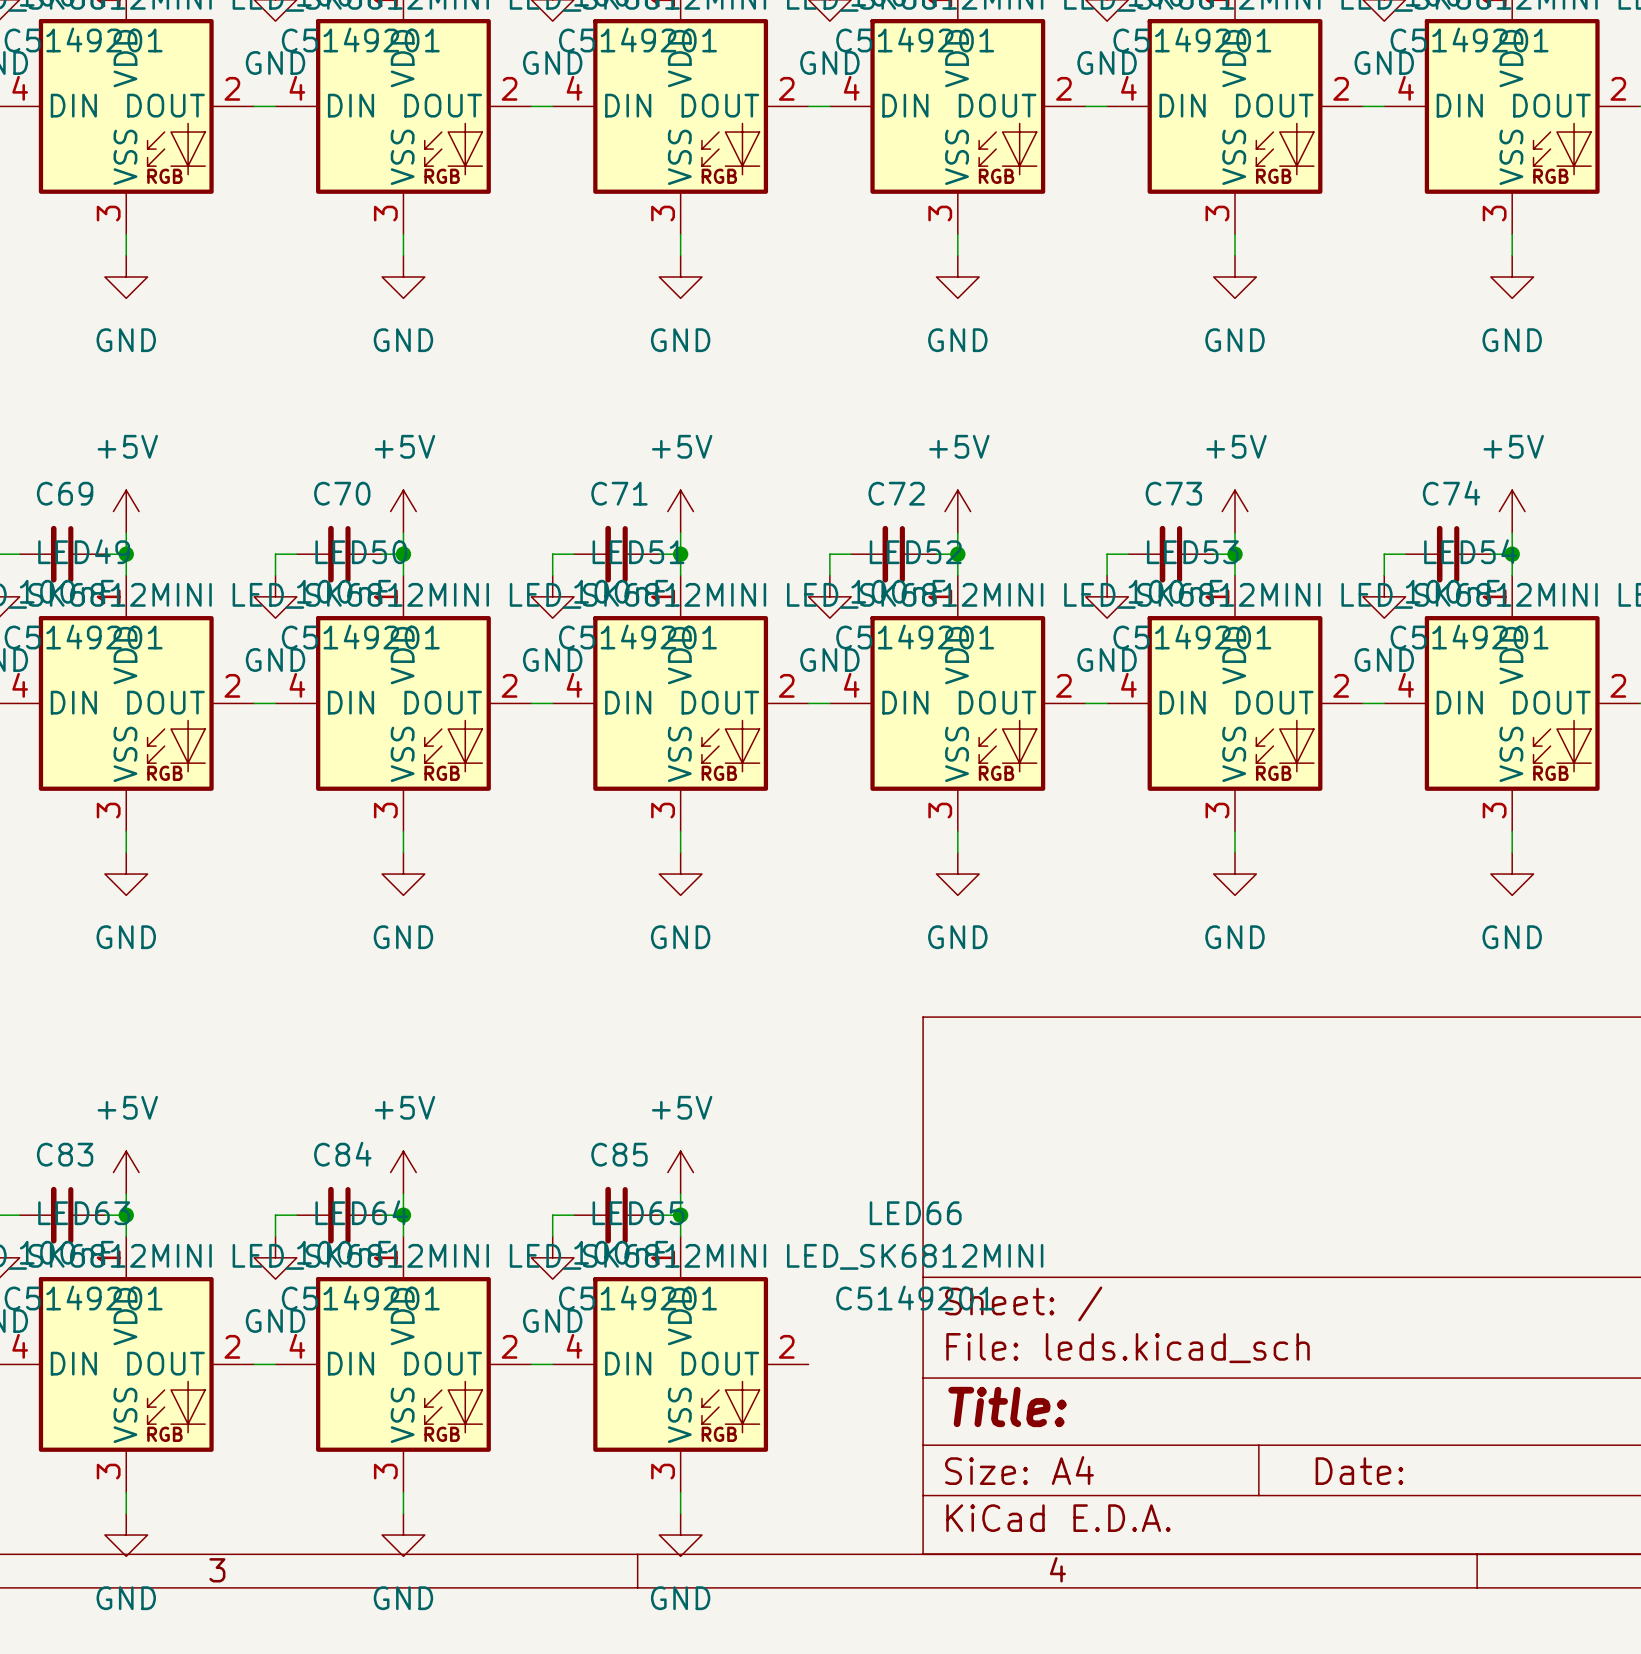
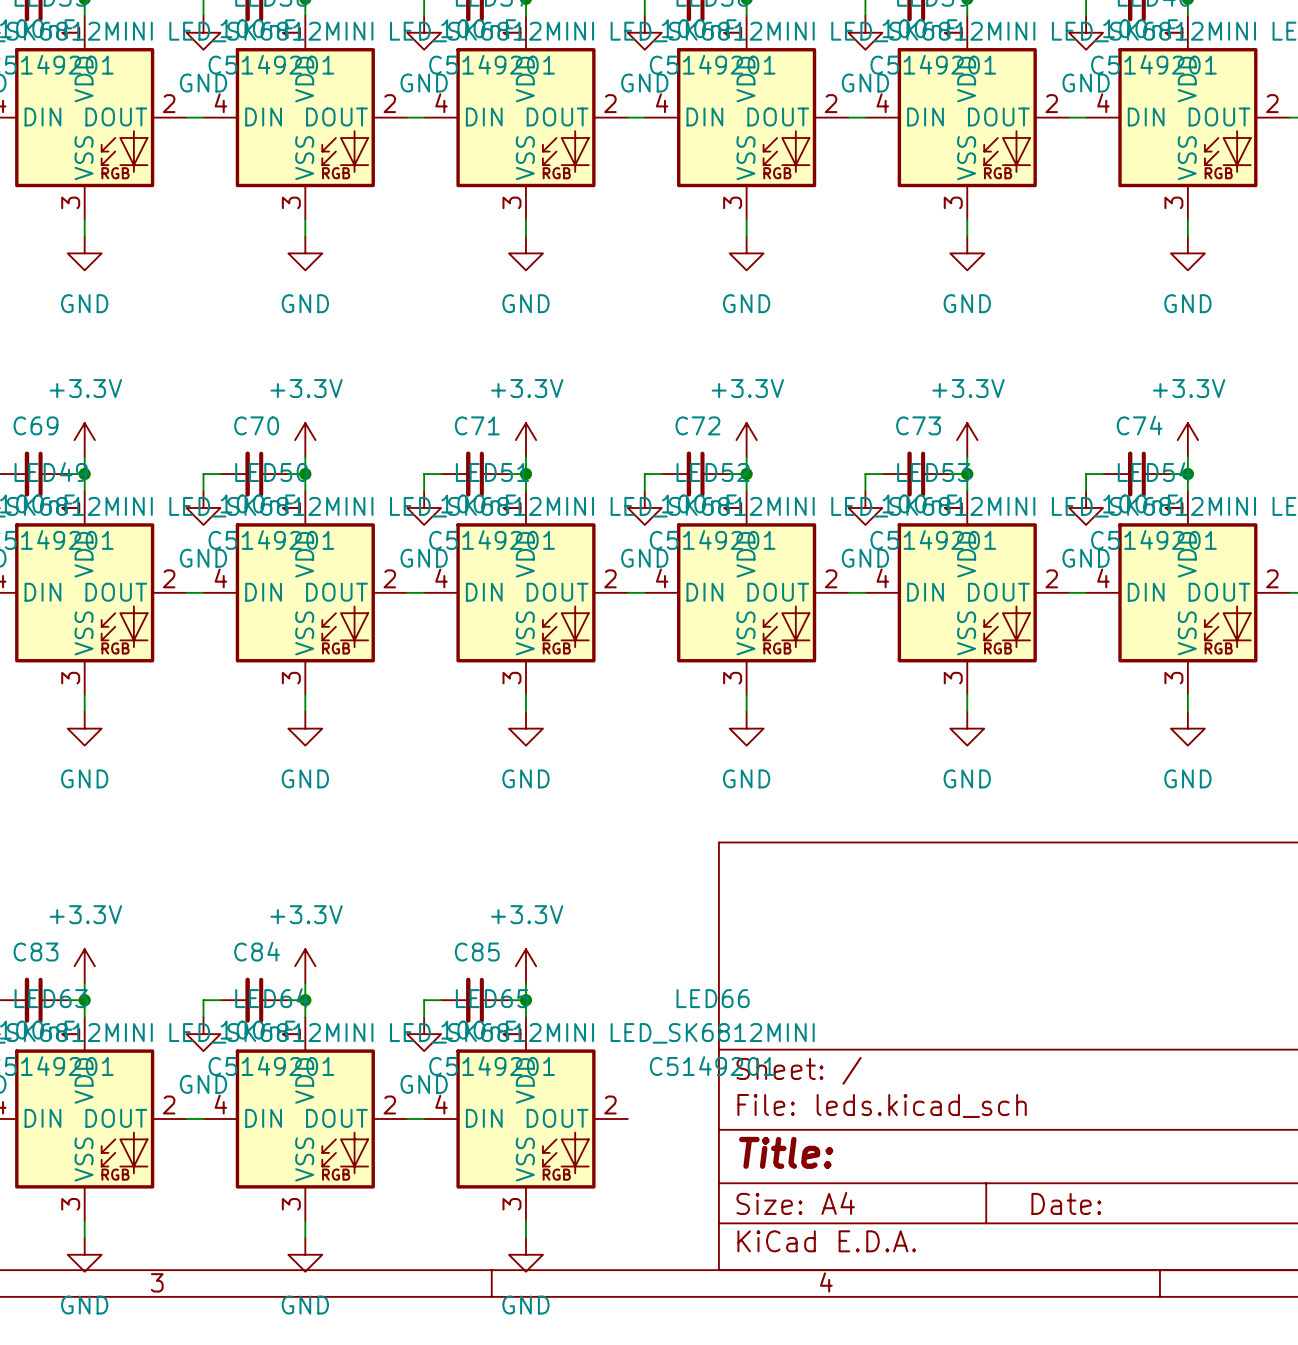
power symbol: +5V (126, 511) -> +3.3V (84, 440)
power symbol: +5V (403, 511) -> +3.3V (305, 440)
power symbol: +5V (680, 511) -> +3.3V (525, 440)
power symbol: +5V (957, 511) -> +3.3V (746, 440)
power symbol: +5V (1235, 511) -> +3.3V (967, 440)
power symbol: +5V (1512, 511) -> +3.3V (1187, 440)
power symbol: +5V (126, 1172) -> +3.3V (84, 966)
power symbol: +5V (403, 1172) -> +3.3V (305, 966)
power symbol: +5V (680, 1172) -> +3.3V (525, 966)

